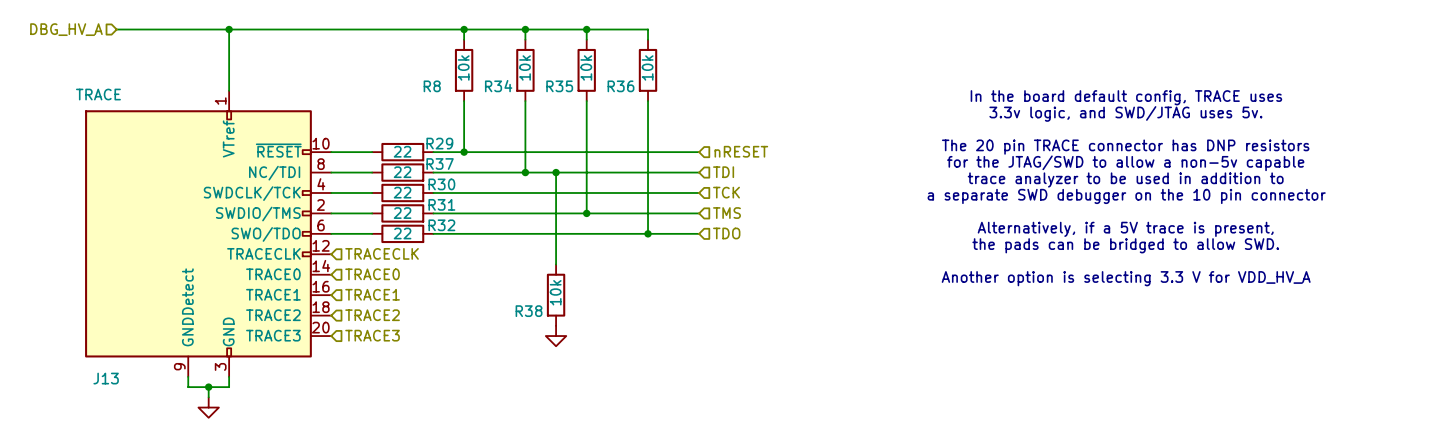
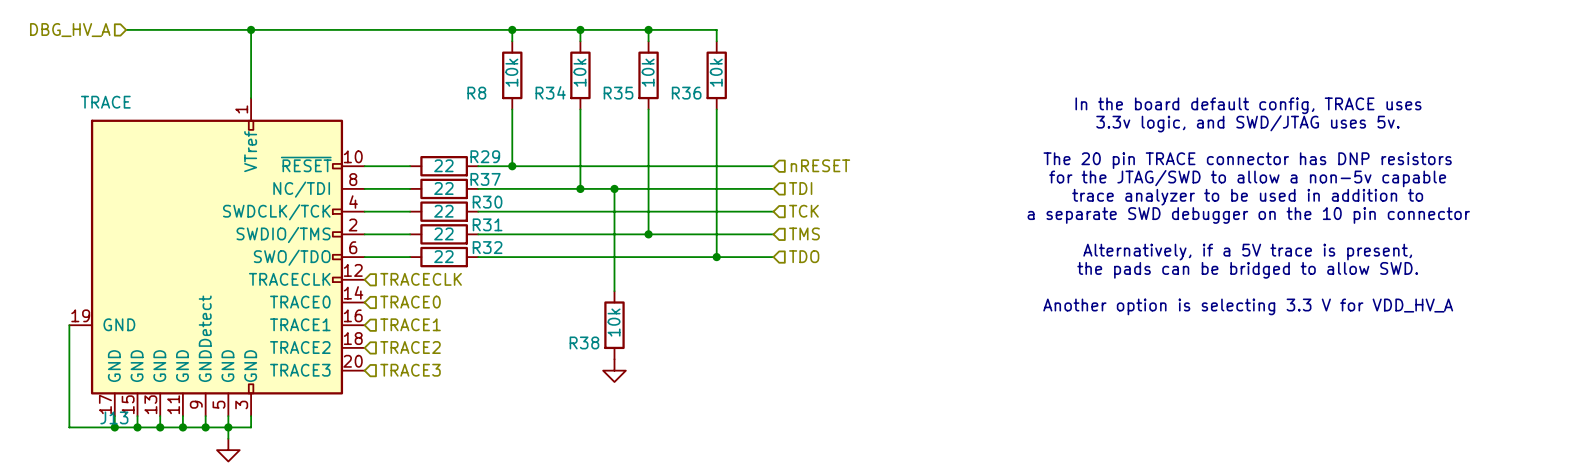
J13 symbol: [85, 90, 332, 377] -> [69, 98, 365, 417]
wire: none -> (69, 325) (69, 427) (205, 427)
wire: none -> (114, 416) (114, 427)
wire: none -> (137, 416) (137, 427)
wire: none -> (160, 416) (160, 427)
wire: none -> (182, 416) (182, 427)
wire: none -> (228, 416) (228, 427)
junction: none -> (114, 427)
junction: none -> (137, 427)
junction: none -> (160, 427)
junction: none -> (182, 427)
junction: none -> (205, 427)

